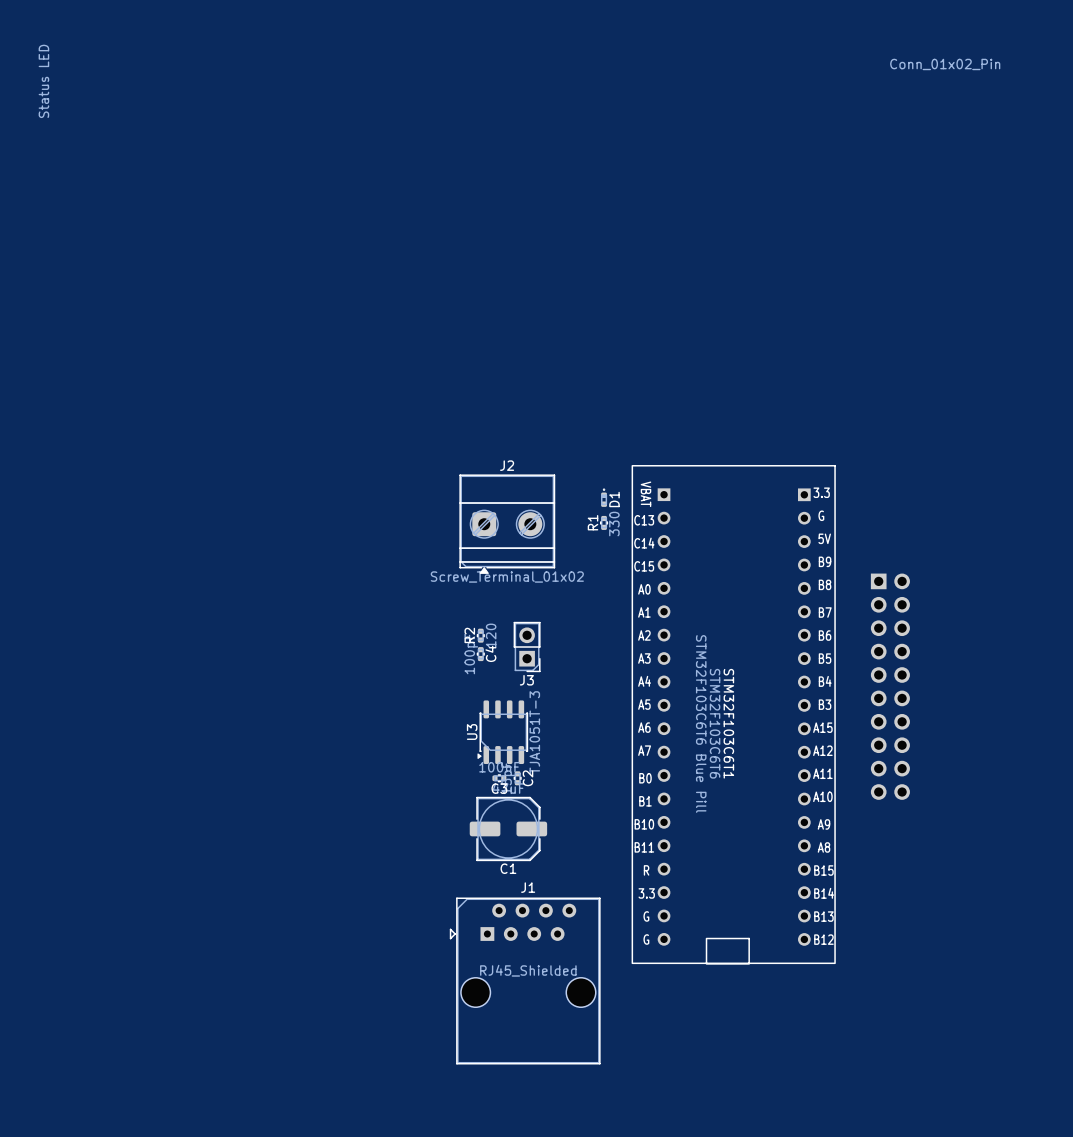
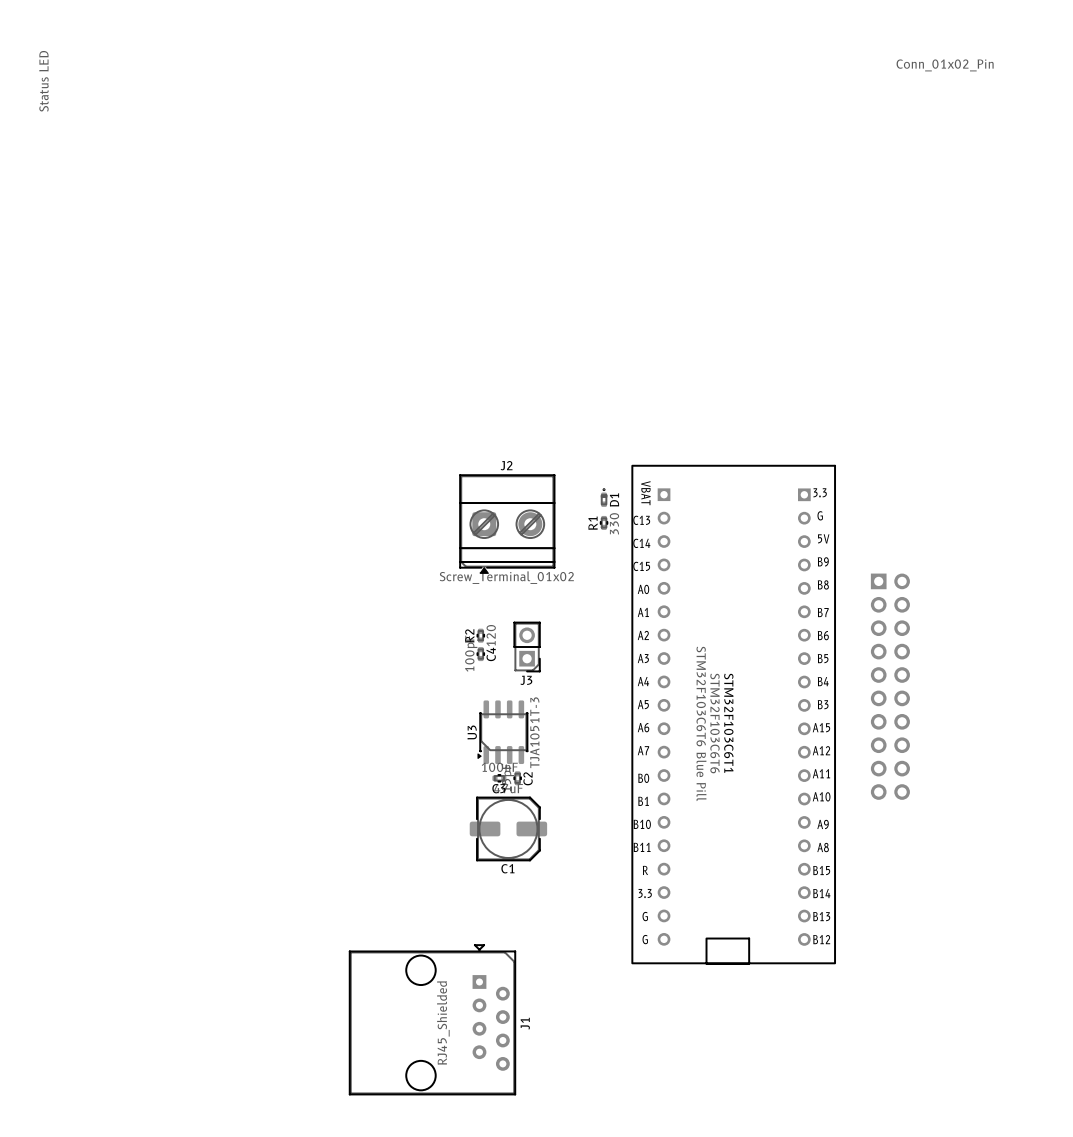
J1 rotation: 0° (525, 980) -> 90° clockwise (432, 1019)
J1 position: (525, 980) -> (432, 1019)

